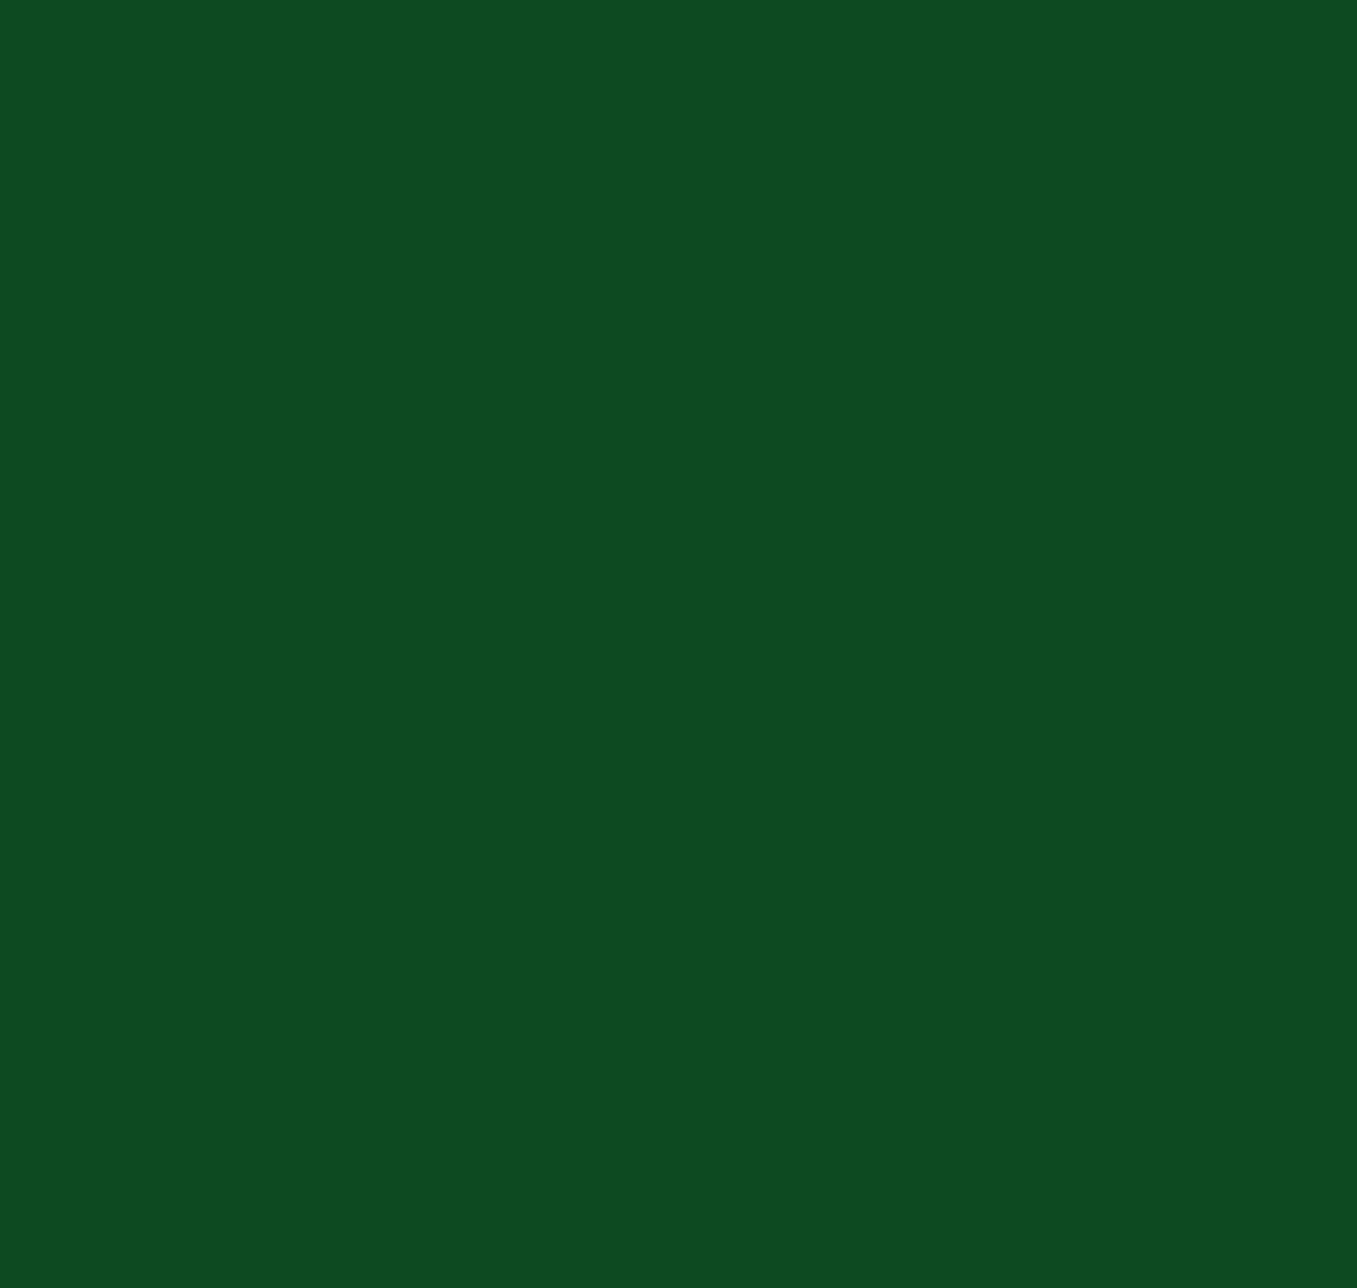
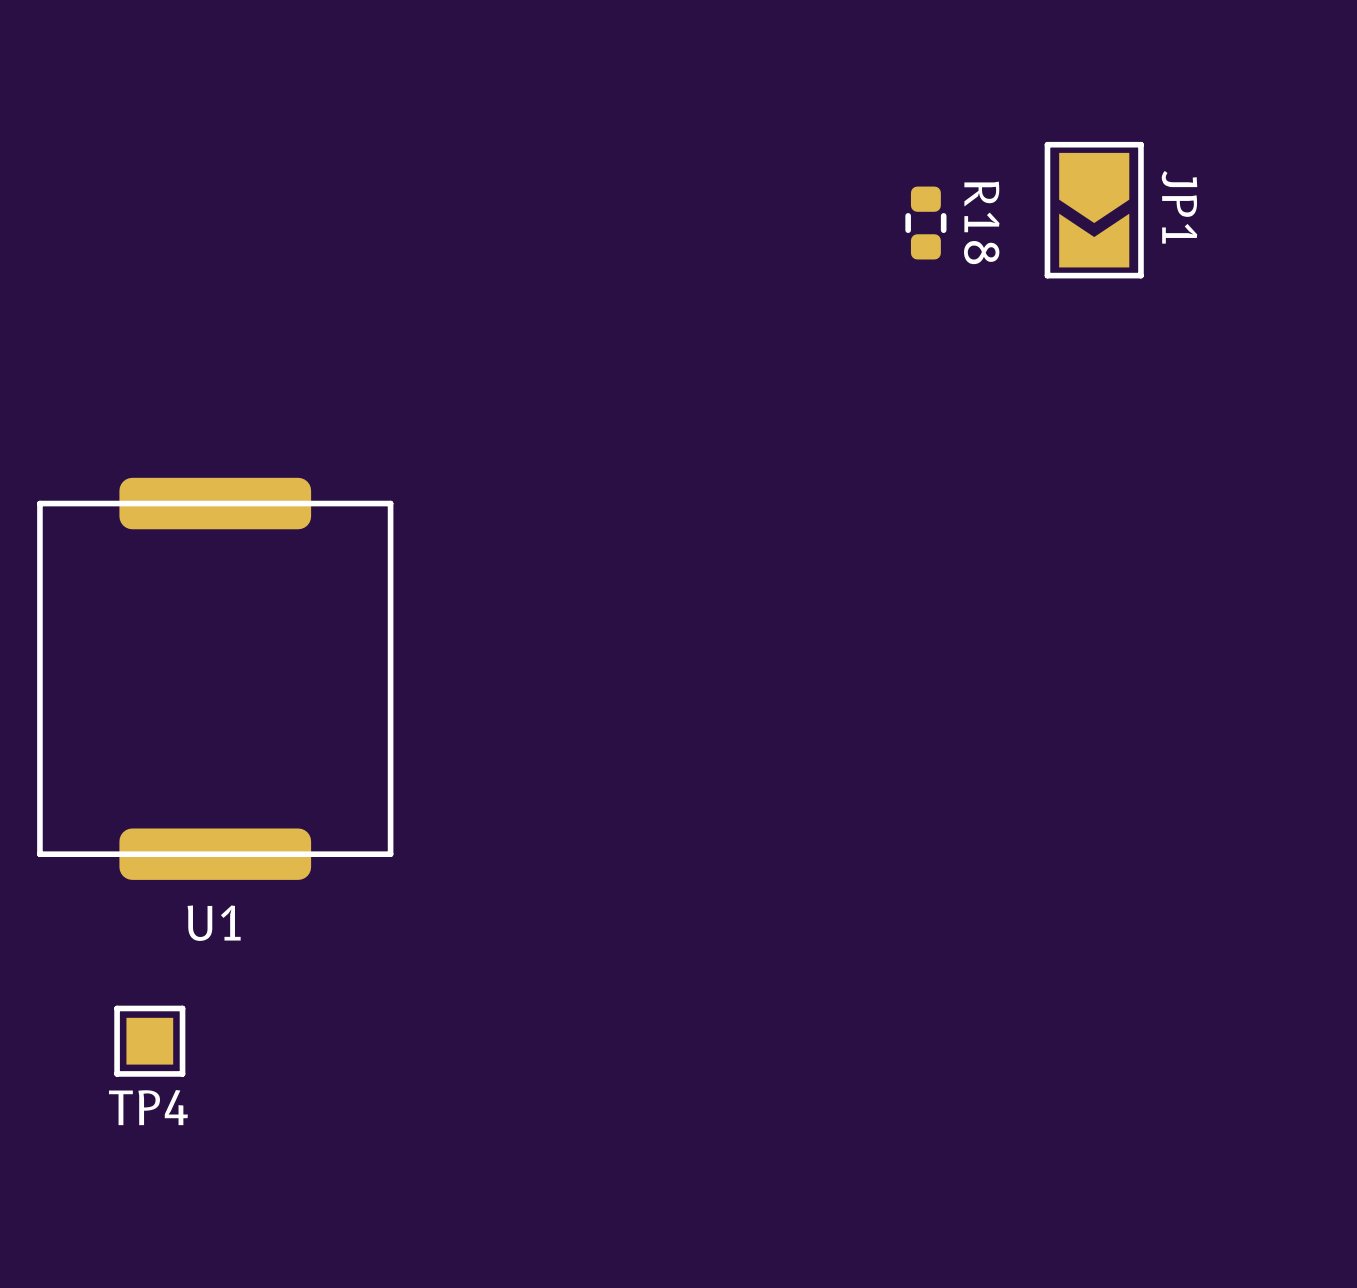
JP1: none -> (1094, 210)
R18: none -> (925, 223)
U1: none -> (215, 678)
TP4: none -> (149, 1041)

